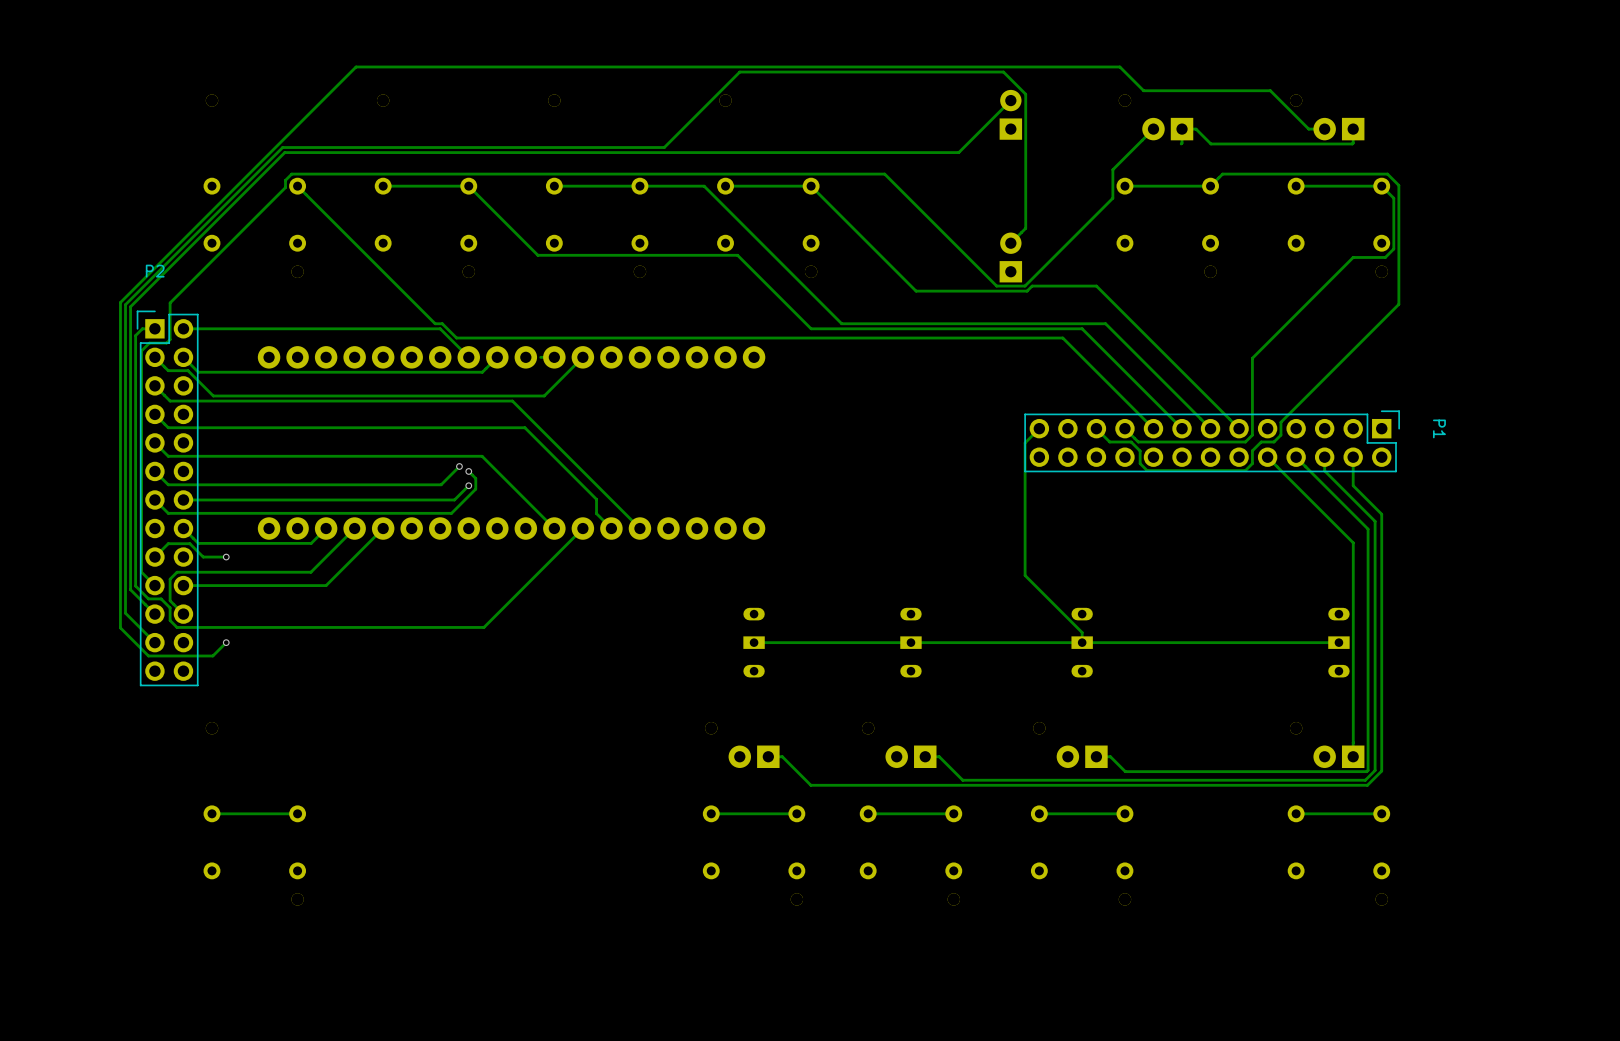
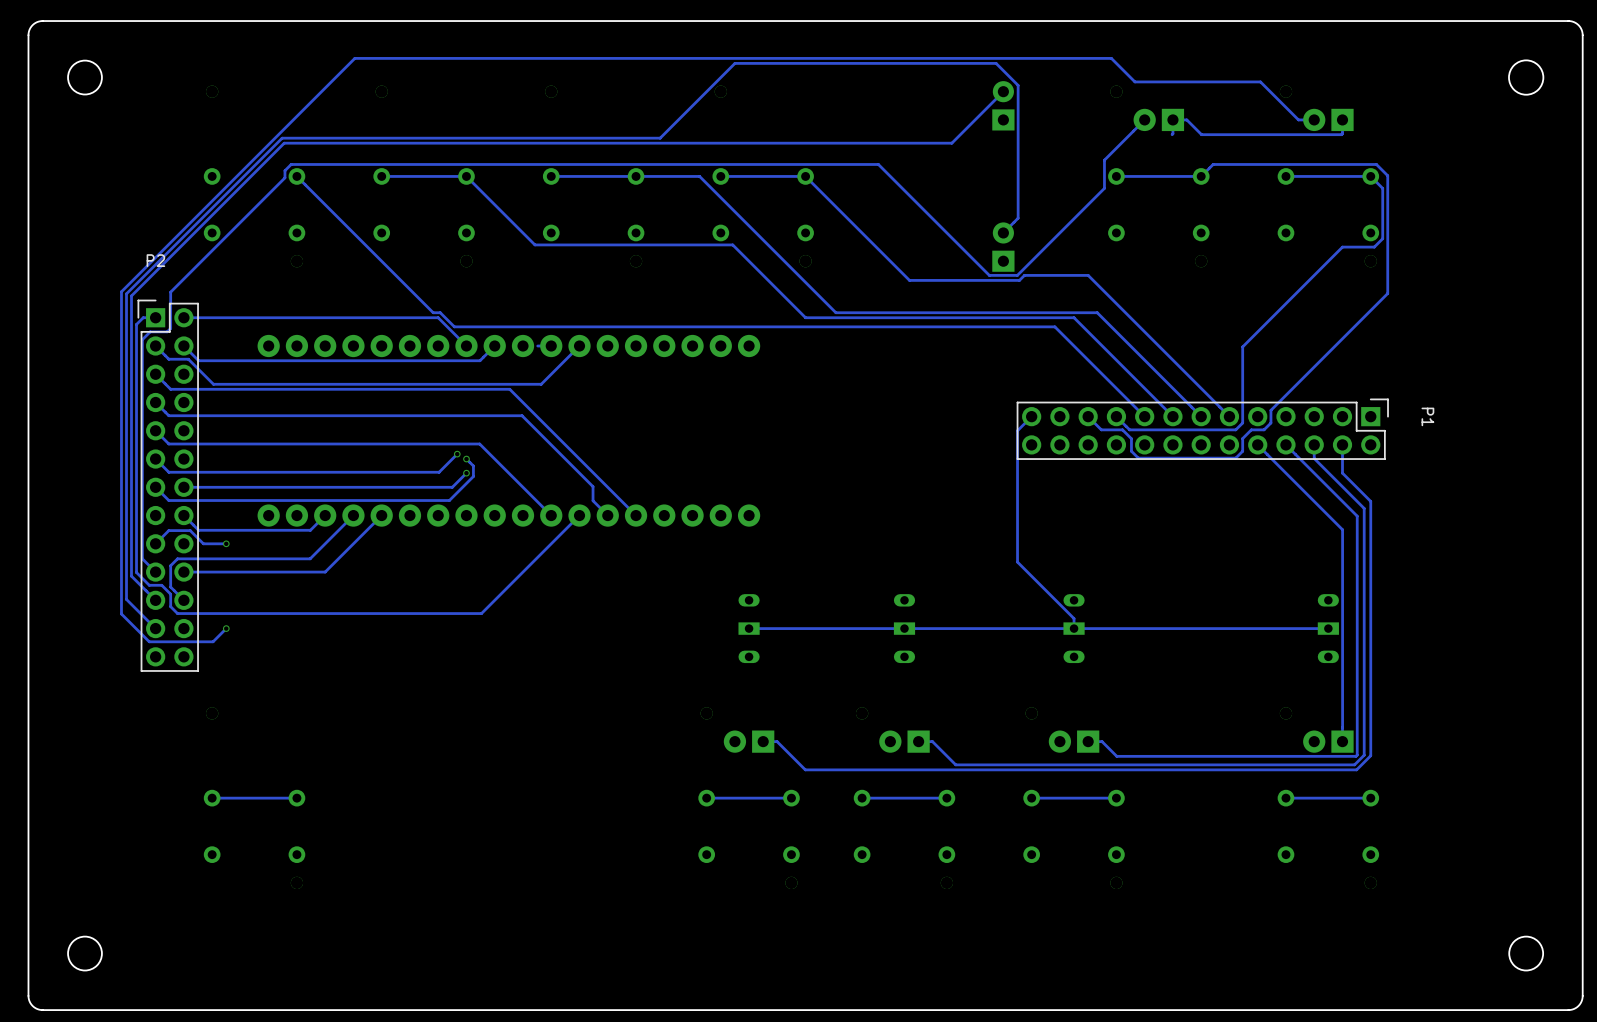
board edge: none -> (1568, 21) (42, 21) (35, 22) (30, 28) (28, 35) (28, 995) (30, 1003) (35, 1008) (42, 1010) (1568, 1010) (1575, 1008) (1580, 1003) (1582, 995) (1582, 35) (1578, 25) (1568, 21)
round board edge: none -> [67, 60, 103, 96]
round board edge: none -> [1508, 59, 1544, 96]
round board edge: none -> [67, 936, 103, 972]
round board edge: none -> [1508, 936, 1544, 972]

